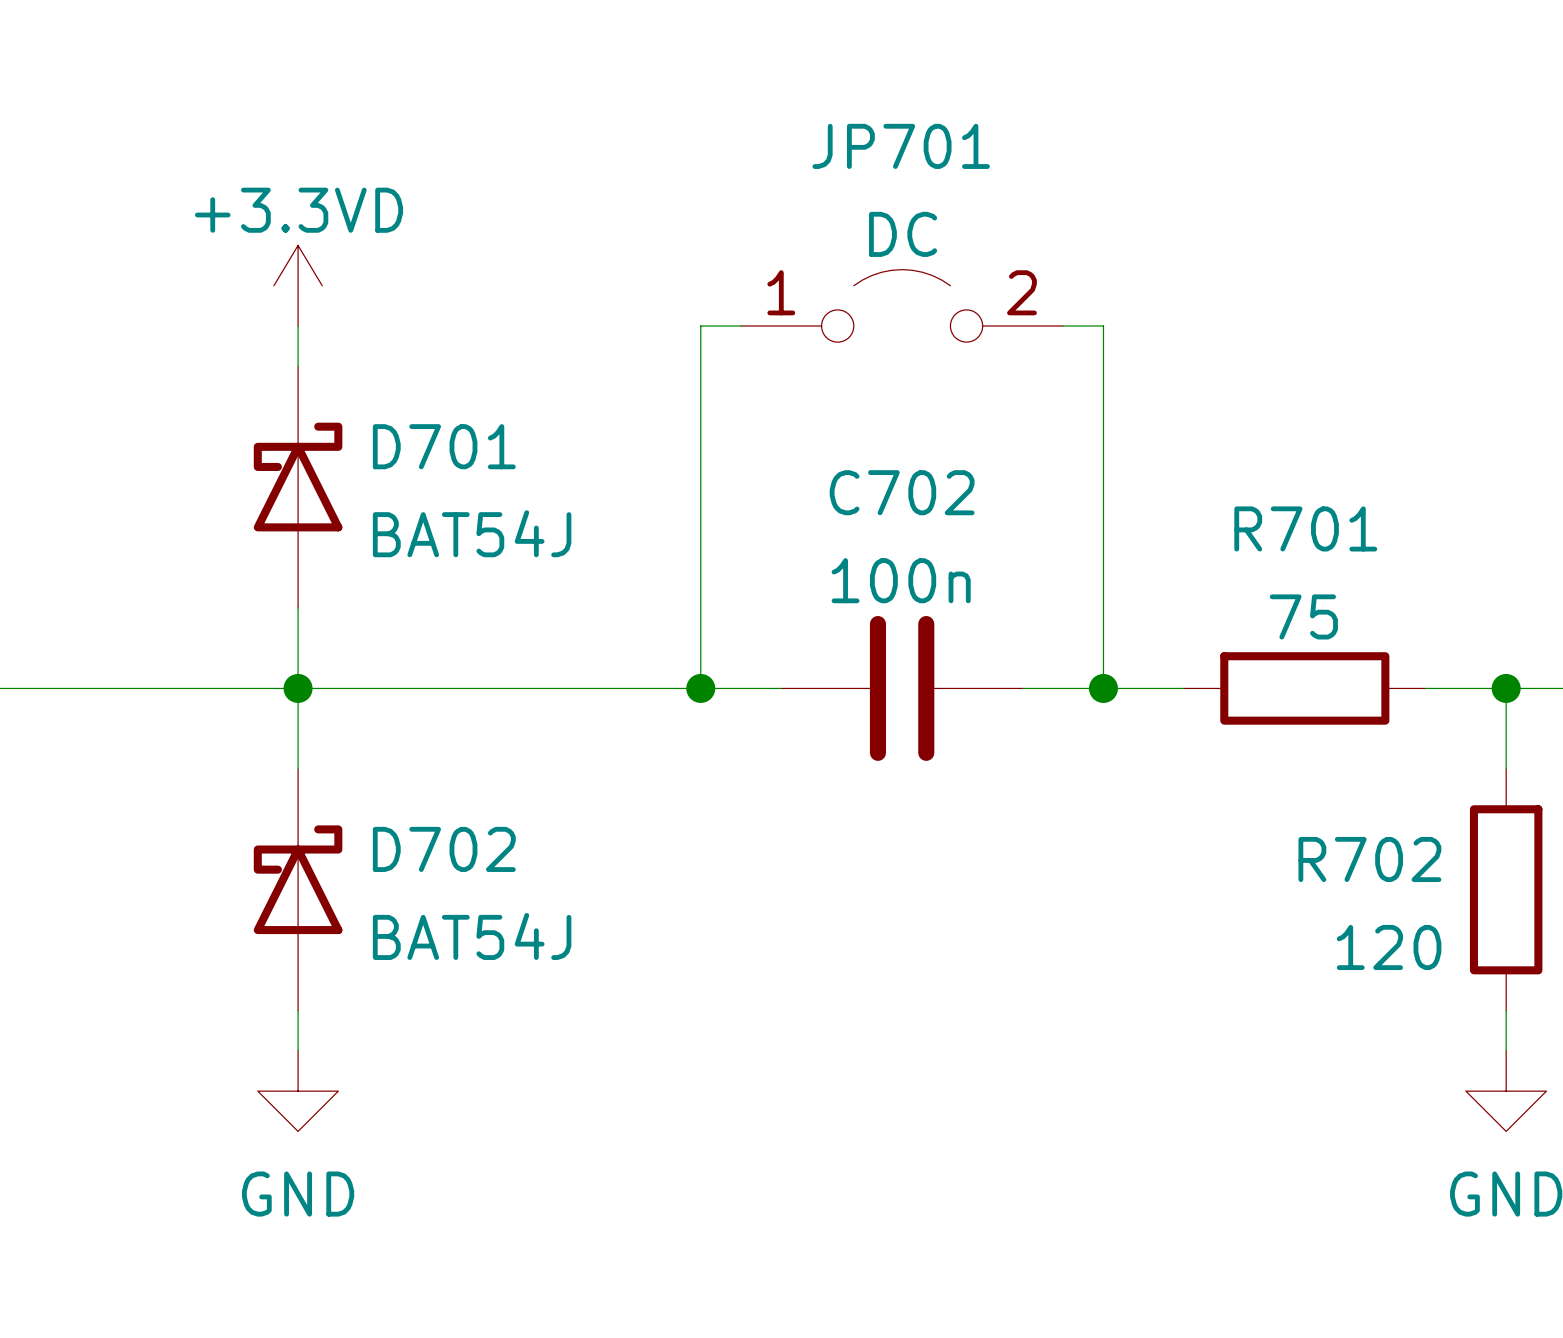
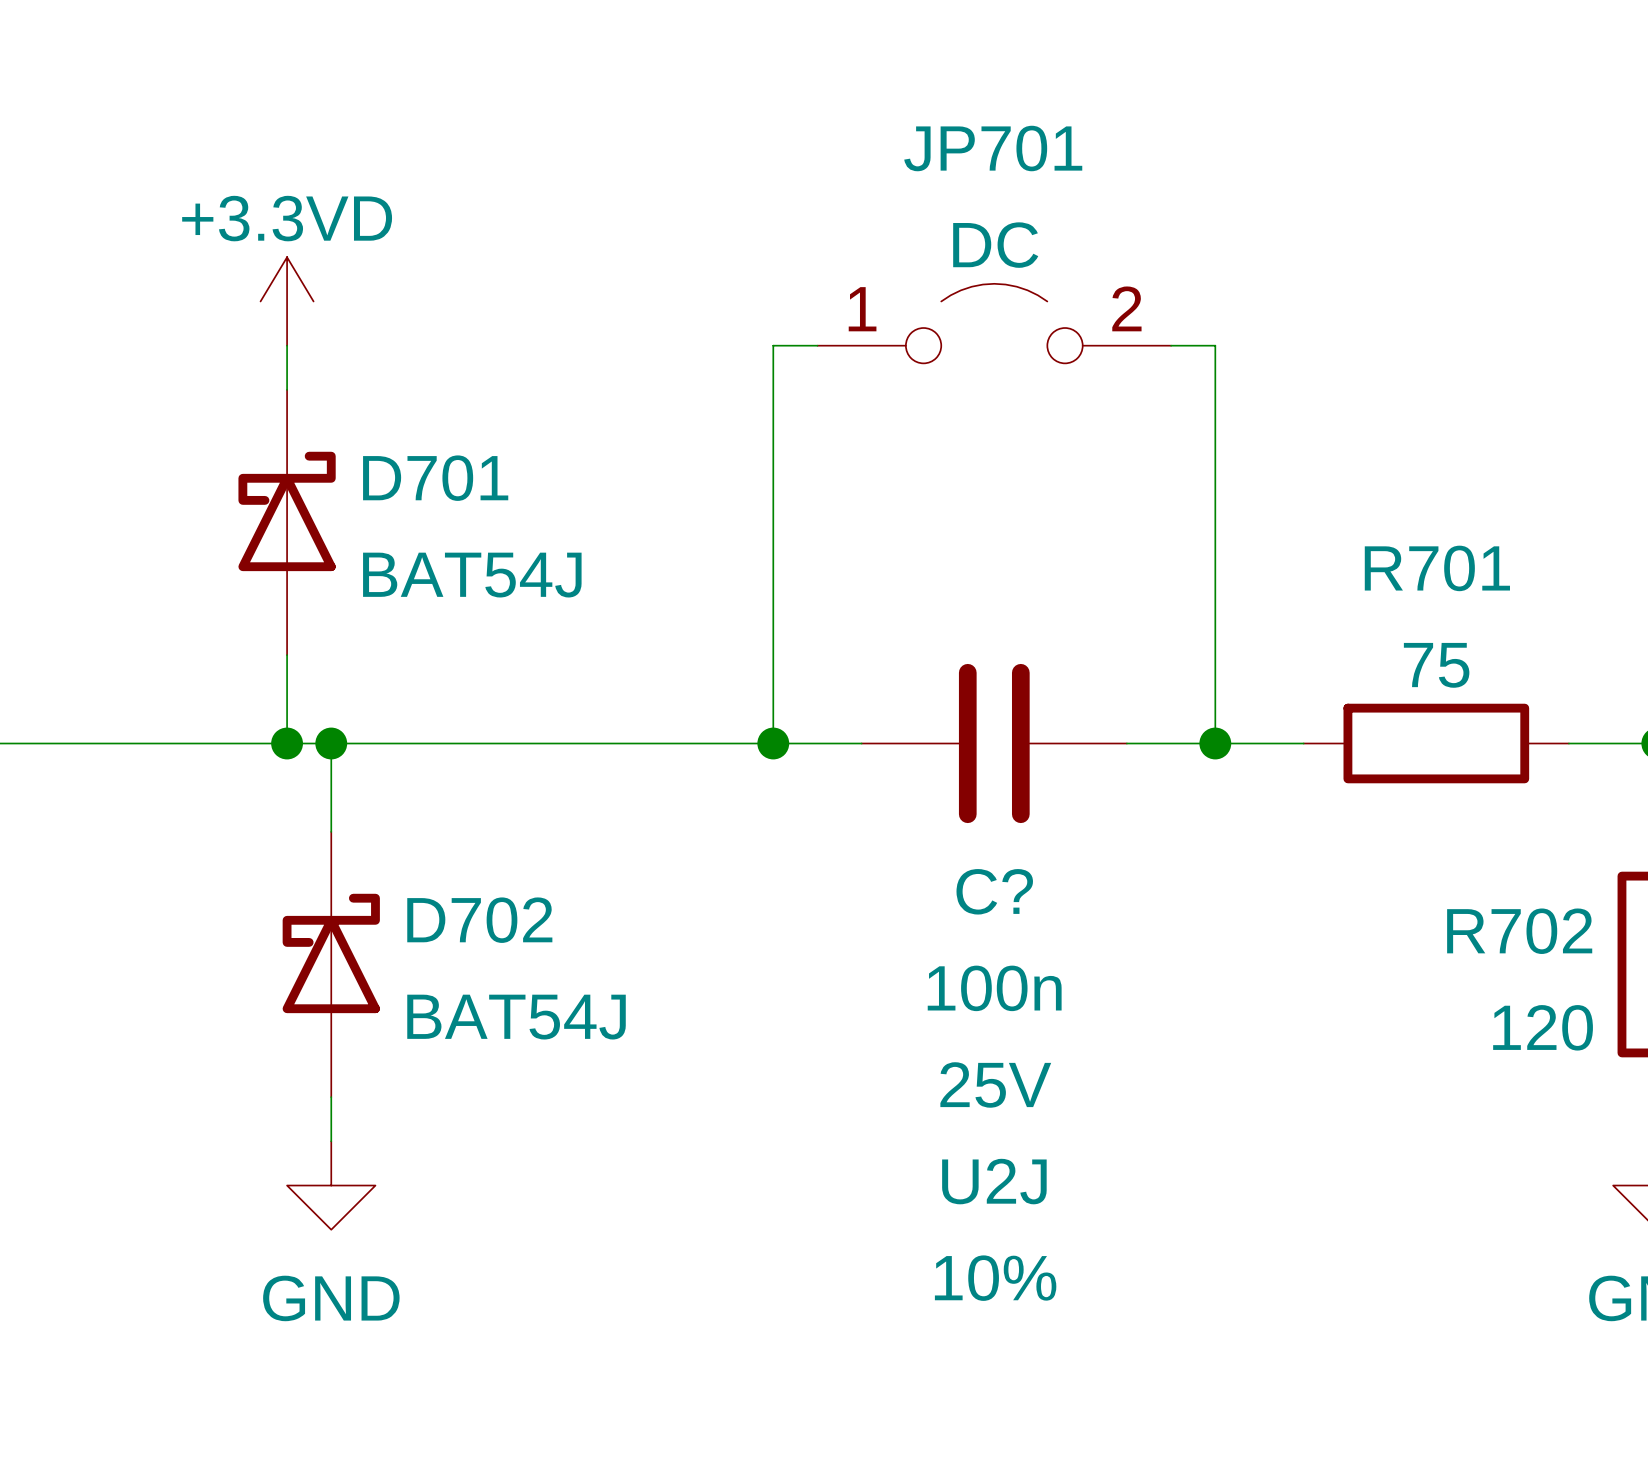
power symbol position: +3.3VD (298, 285) -> +3.3VD (287, 301)
wire: (298, 326) (298, 366) -> (287, 345) (287, 389)
D701 position: (298, 487) -> (287, 522)
C702 name: C702 (902, 492) -> C? (994, 891)
C702 value position: 100n (901, 580) -> 100n (994, 988)
wire: (298, 607) (298, 688) -> (287, 655) (287, 743)
junction: none -> (287, 743)
C702 text: none -> 25V (995, 1084)
C702 text: none -> U2J (994, 1181)
C702 text: none -> 10% (995, 1278)

